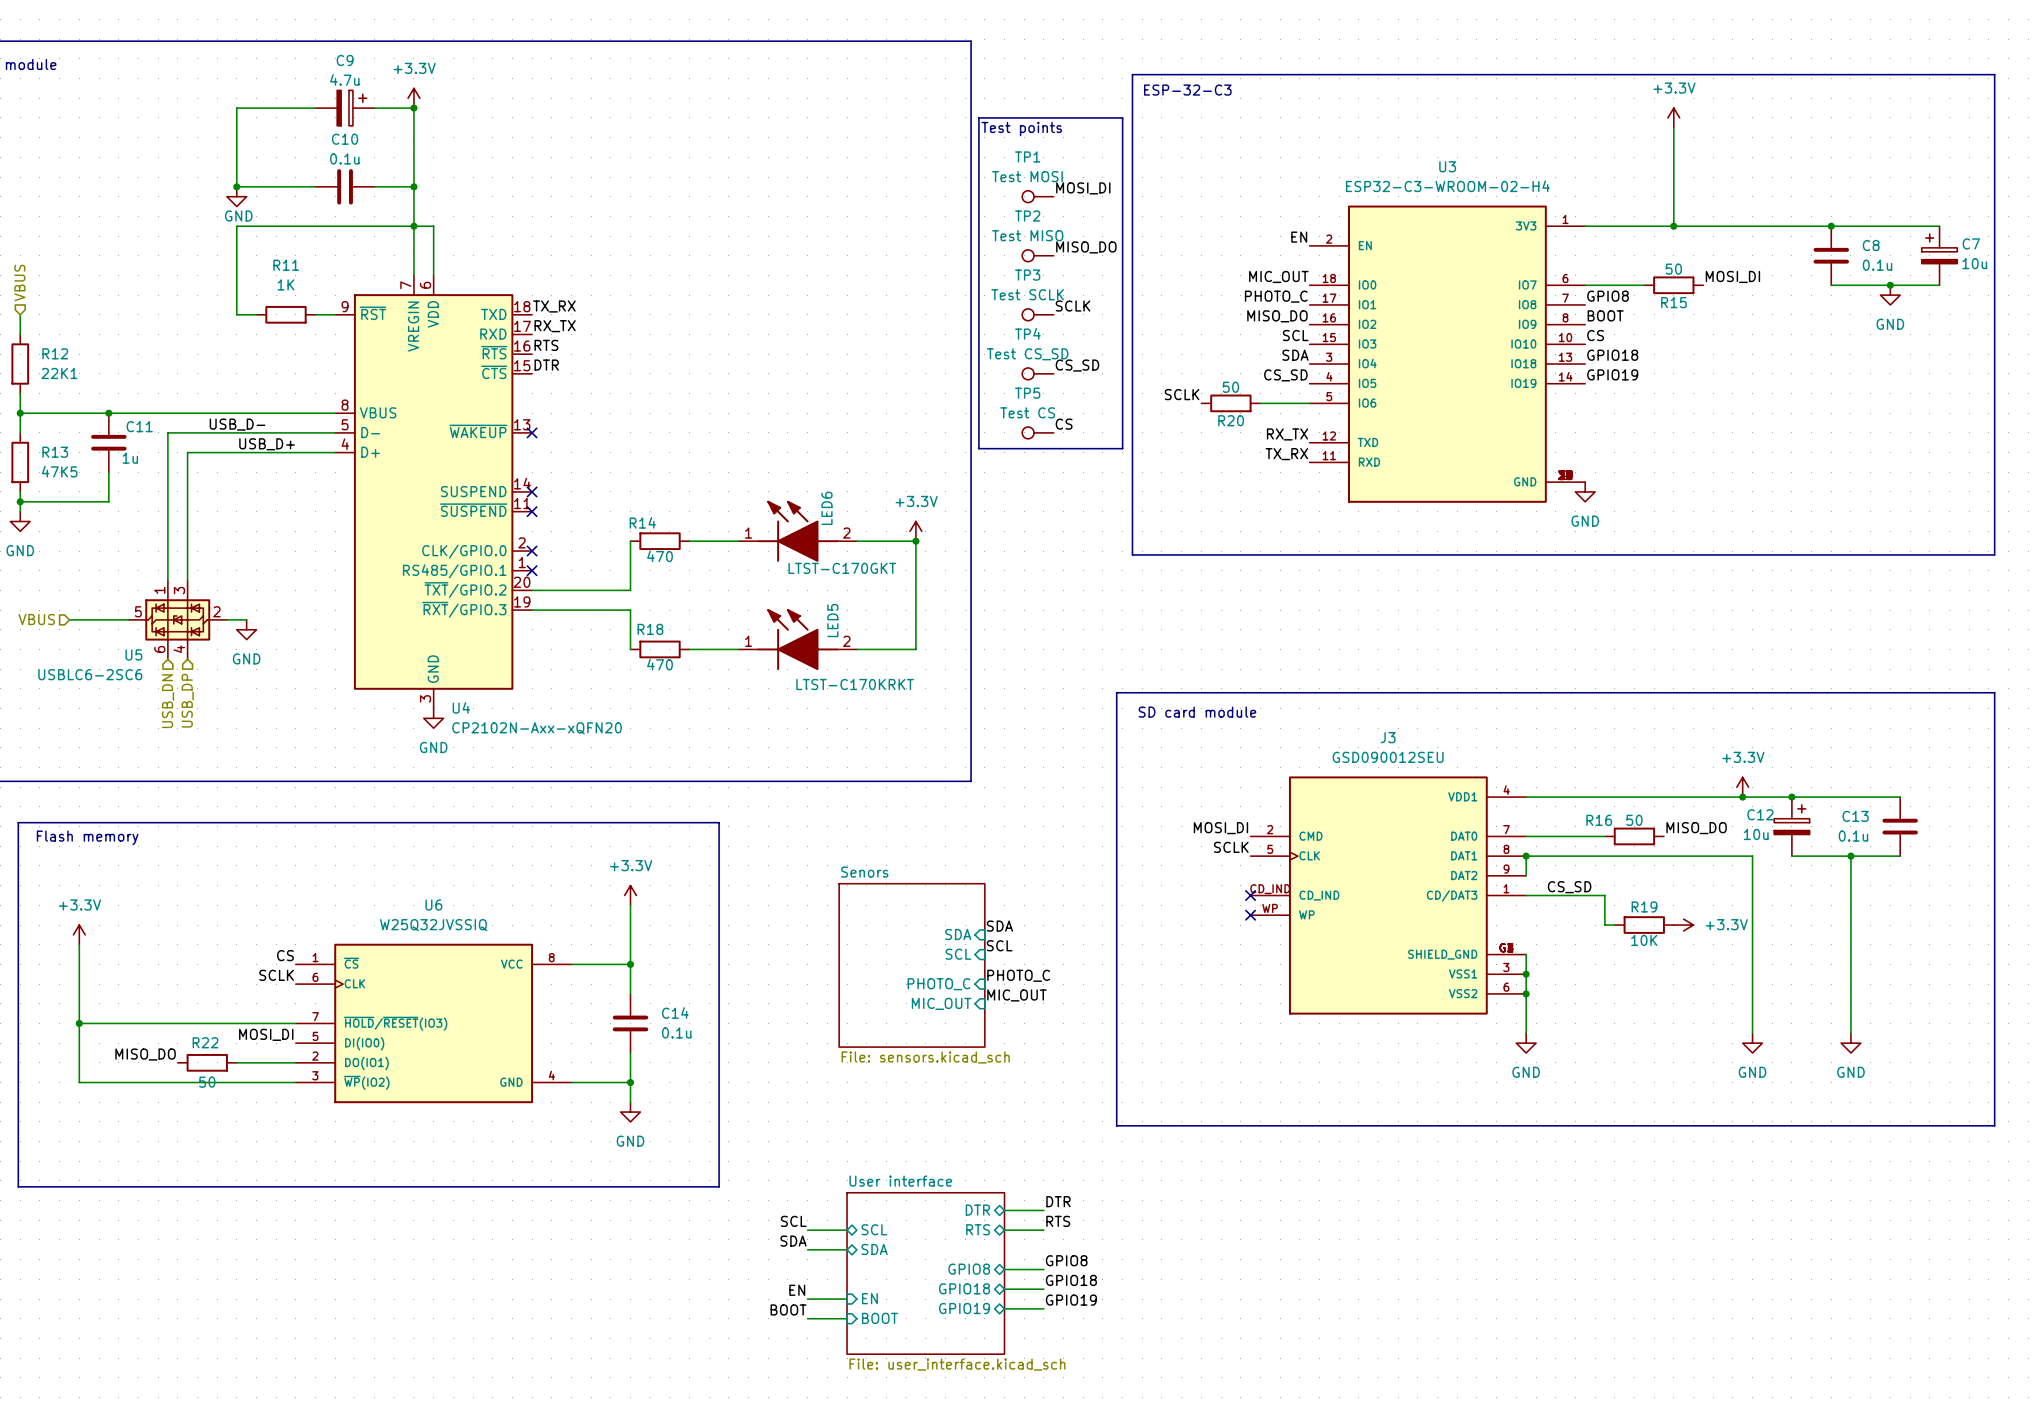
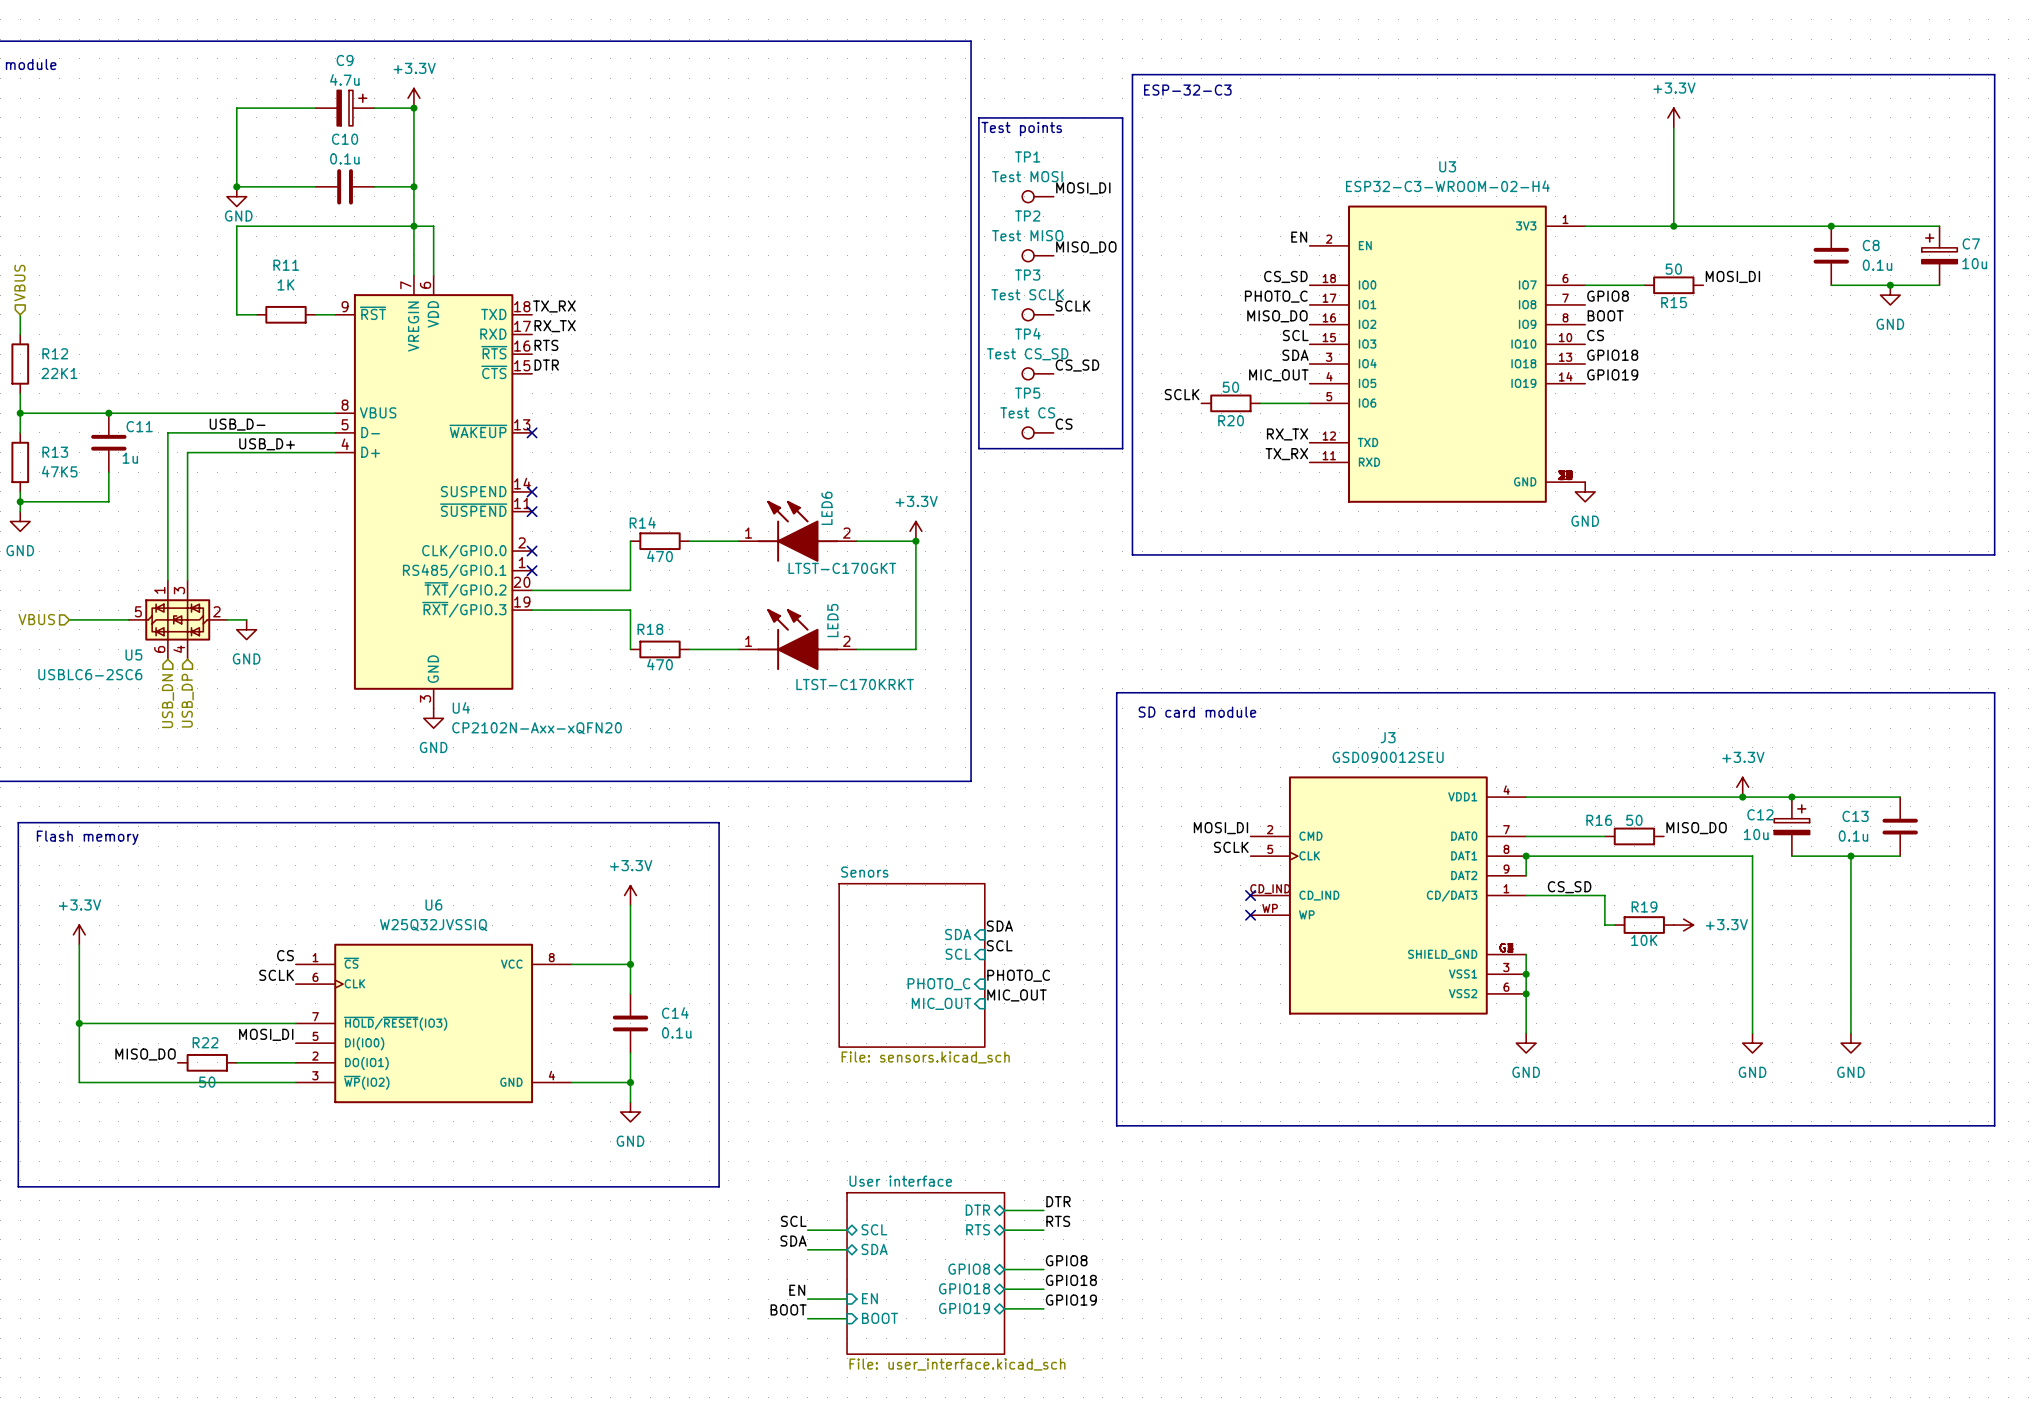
label: MIC_OUT (1278, 276) -> CS_SD (1285, 276)
label: CS_SD (1285, 375) -> MIC_OUT (1278, 375)

